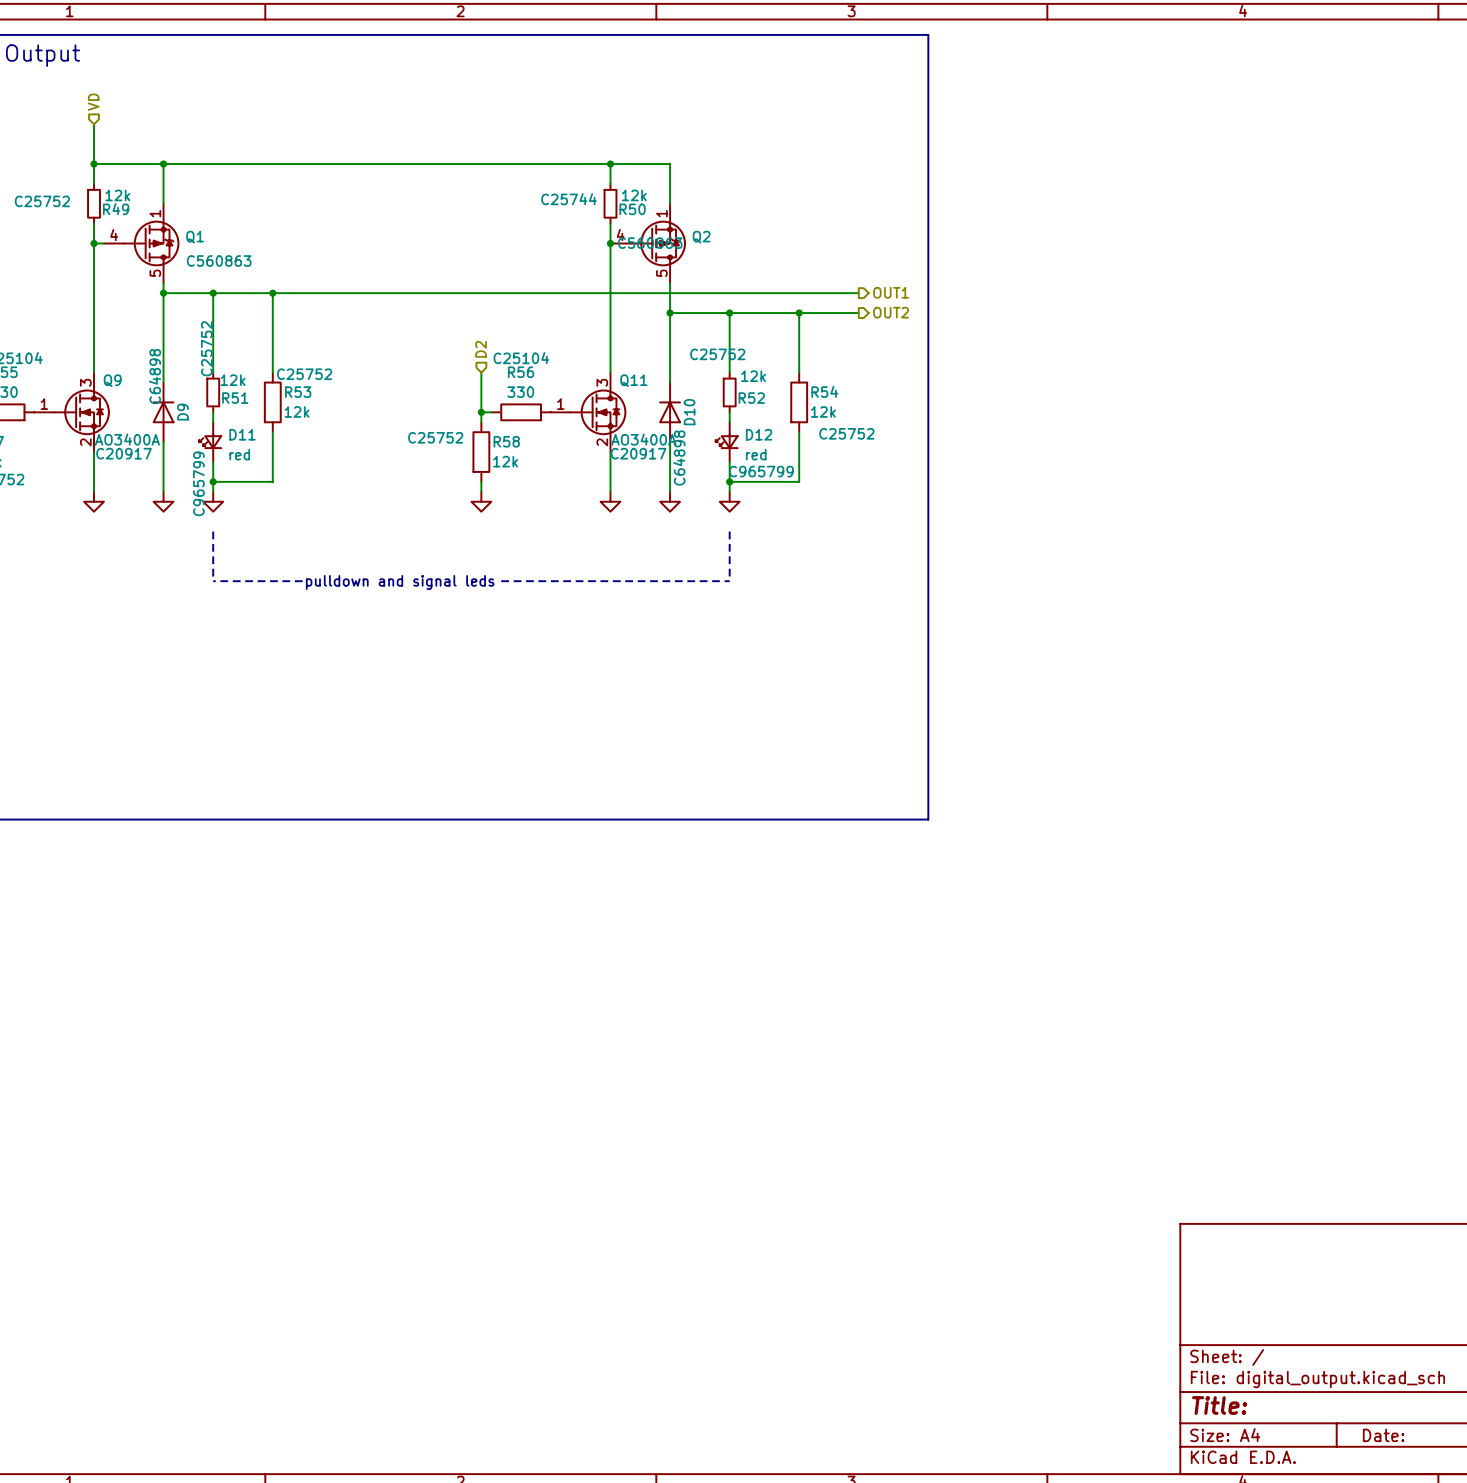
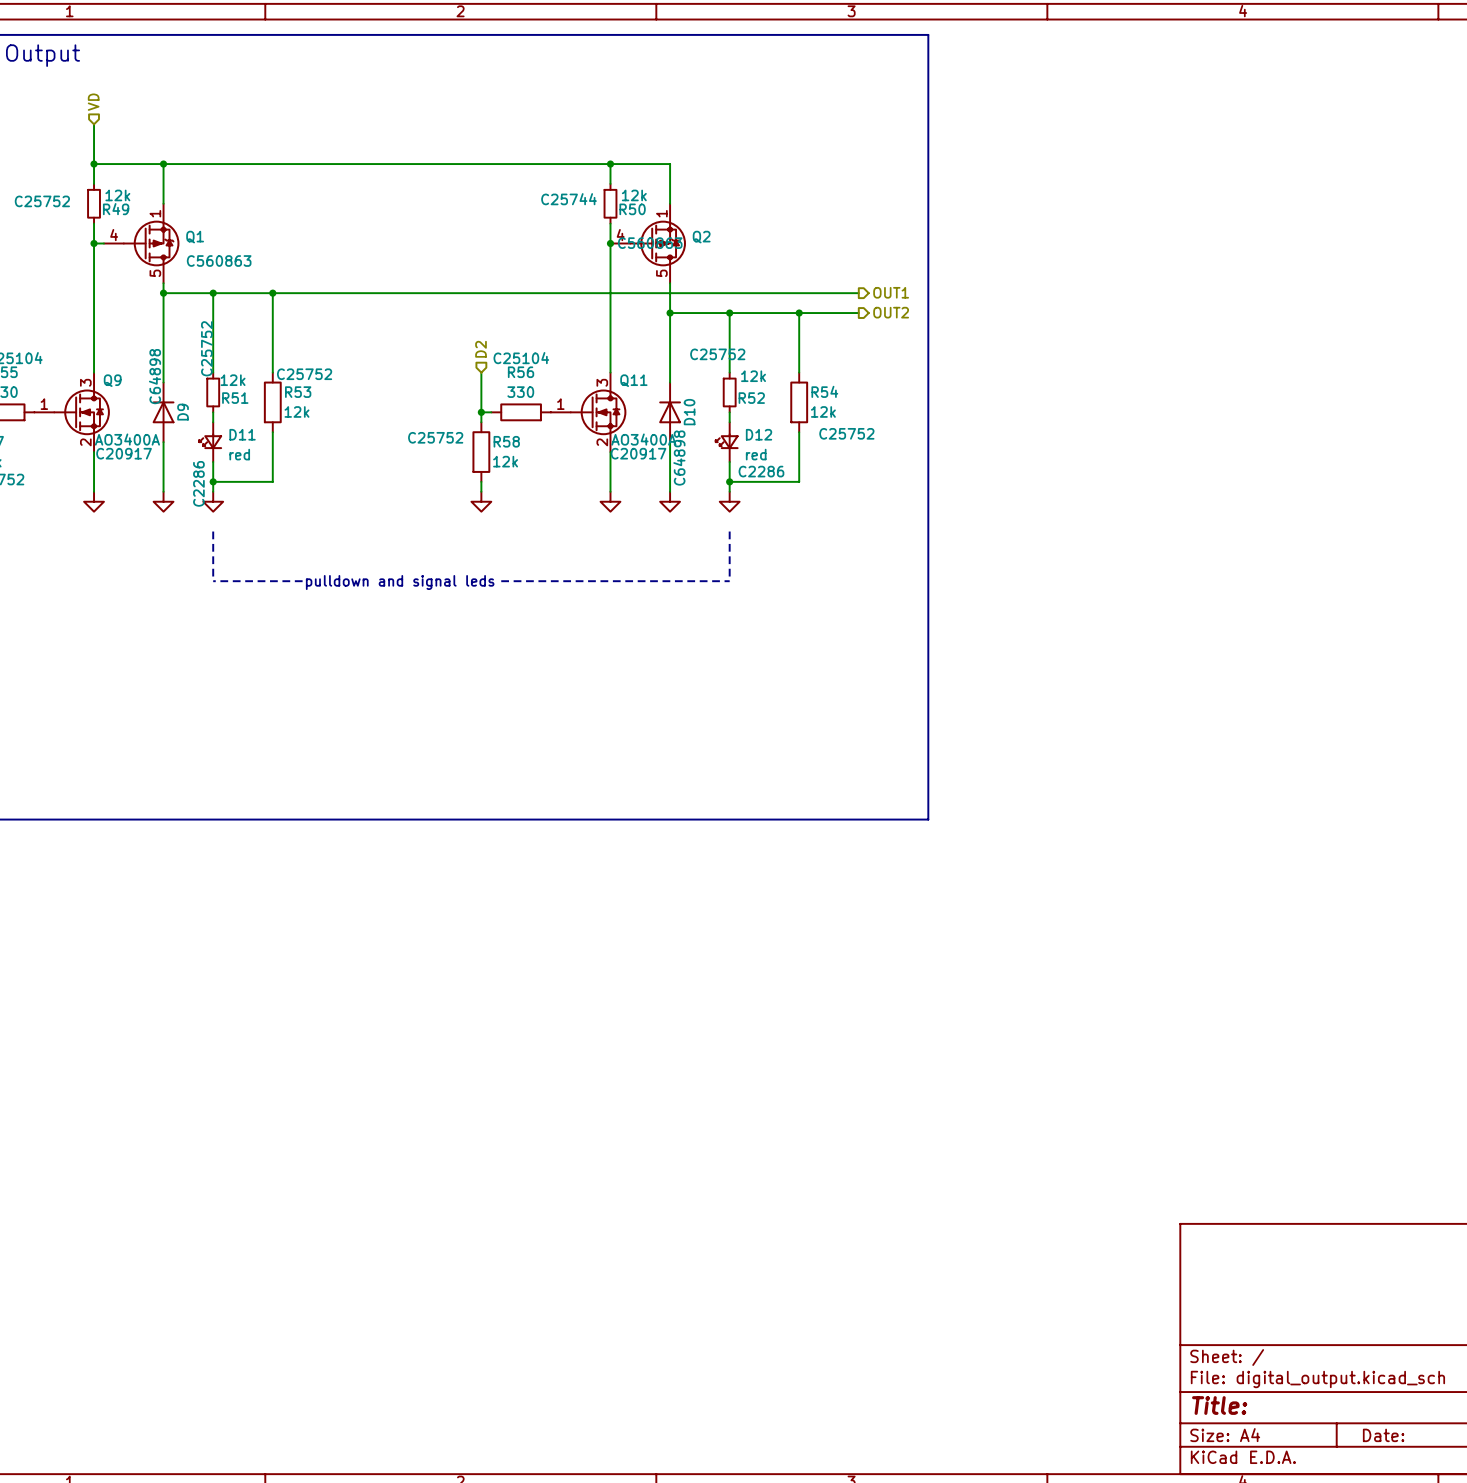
D12 text: C965799 (761, 471) -> C2286 (761, 471)
D11 text: C965799 (198, 483) -> C2286 (198, 483)

